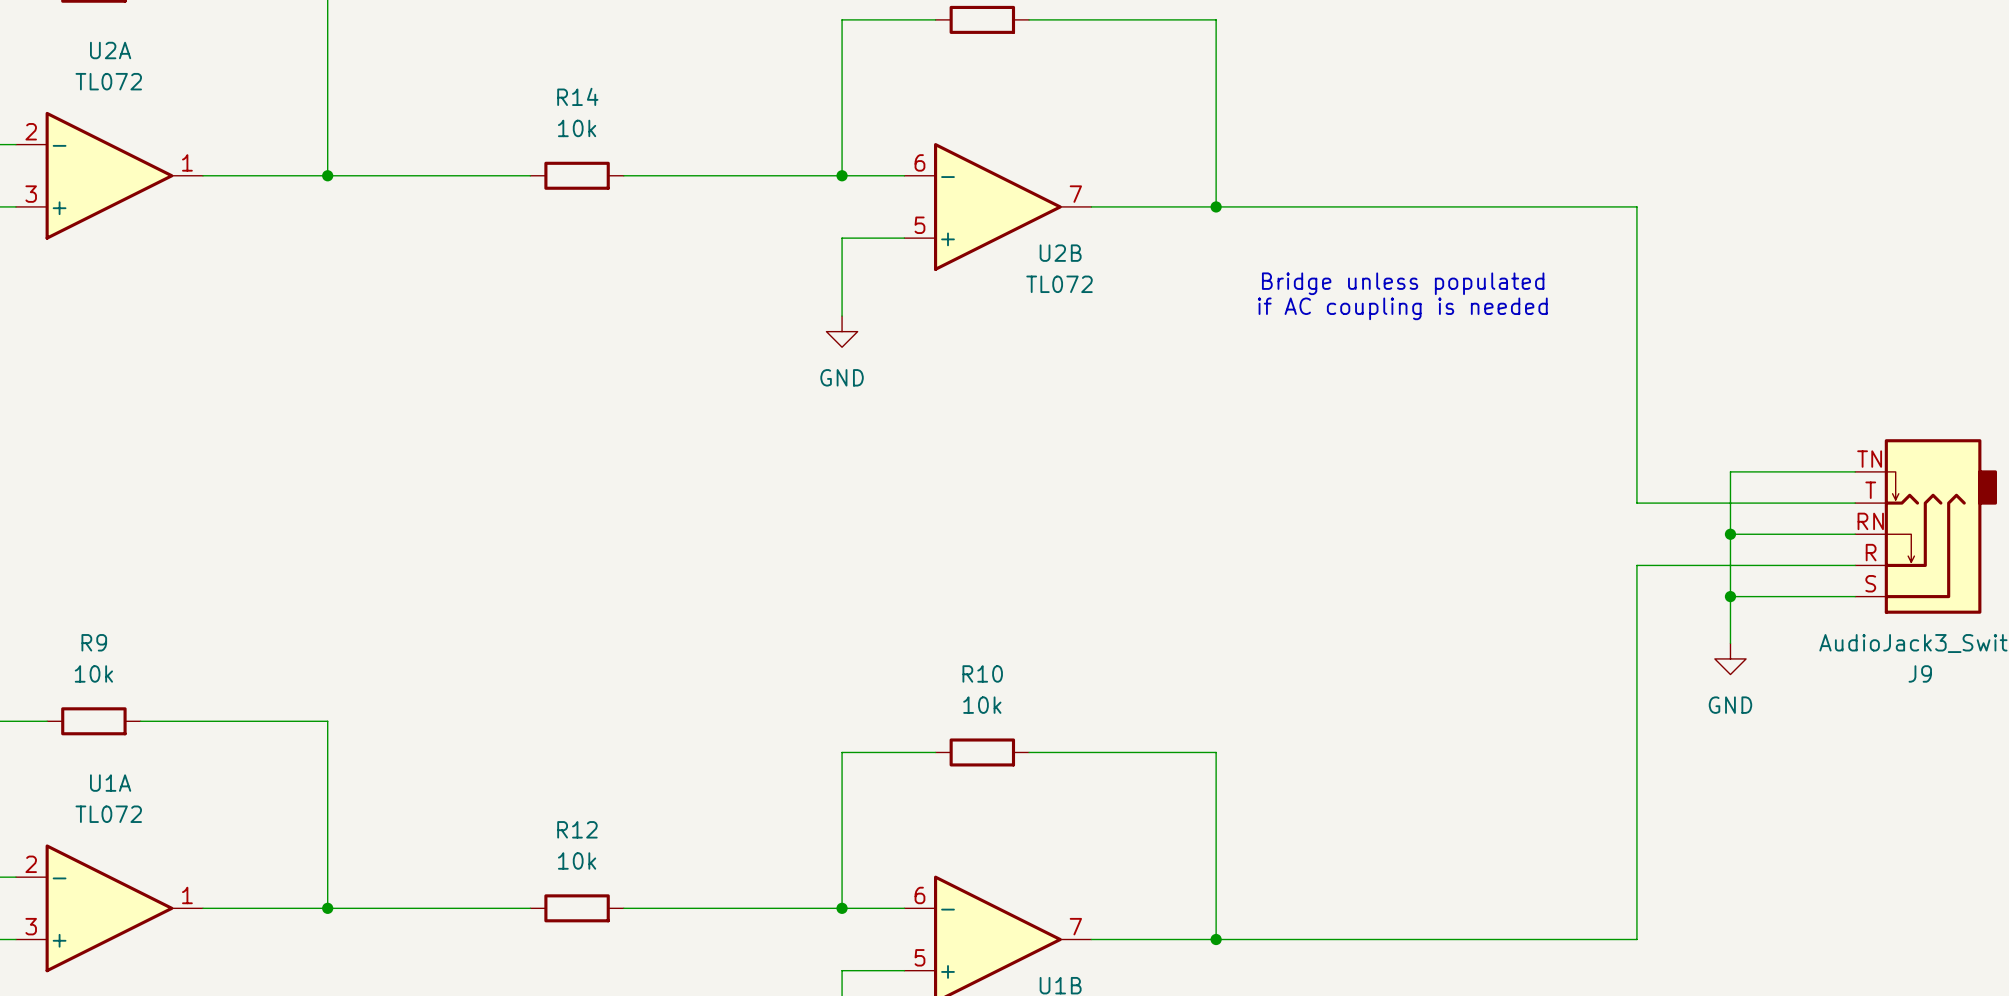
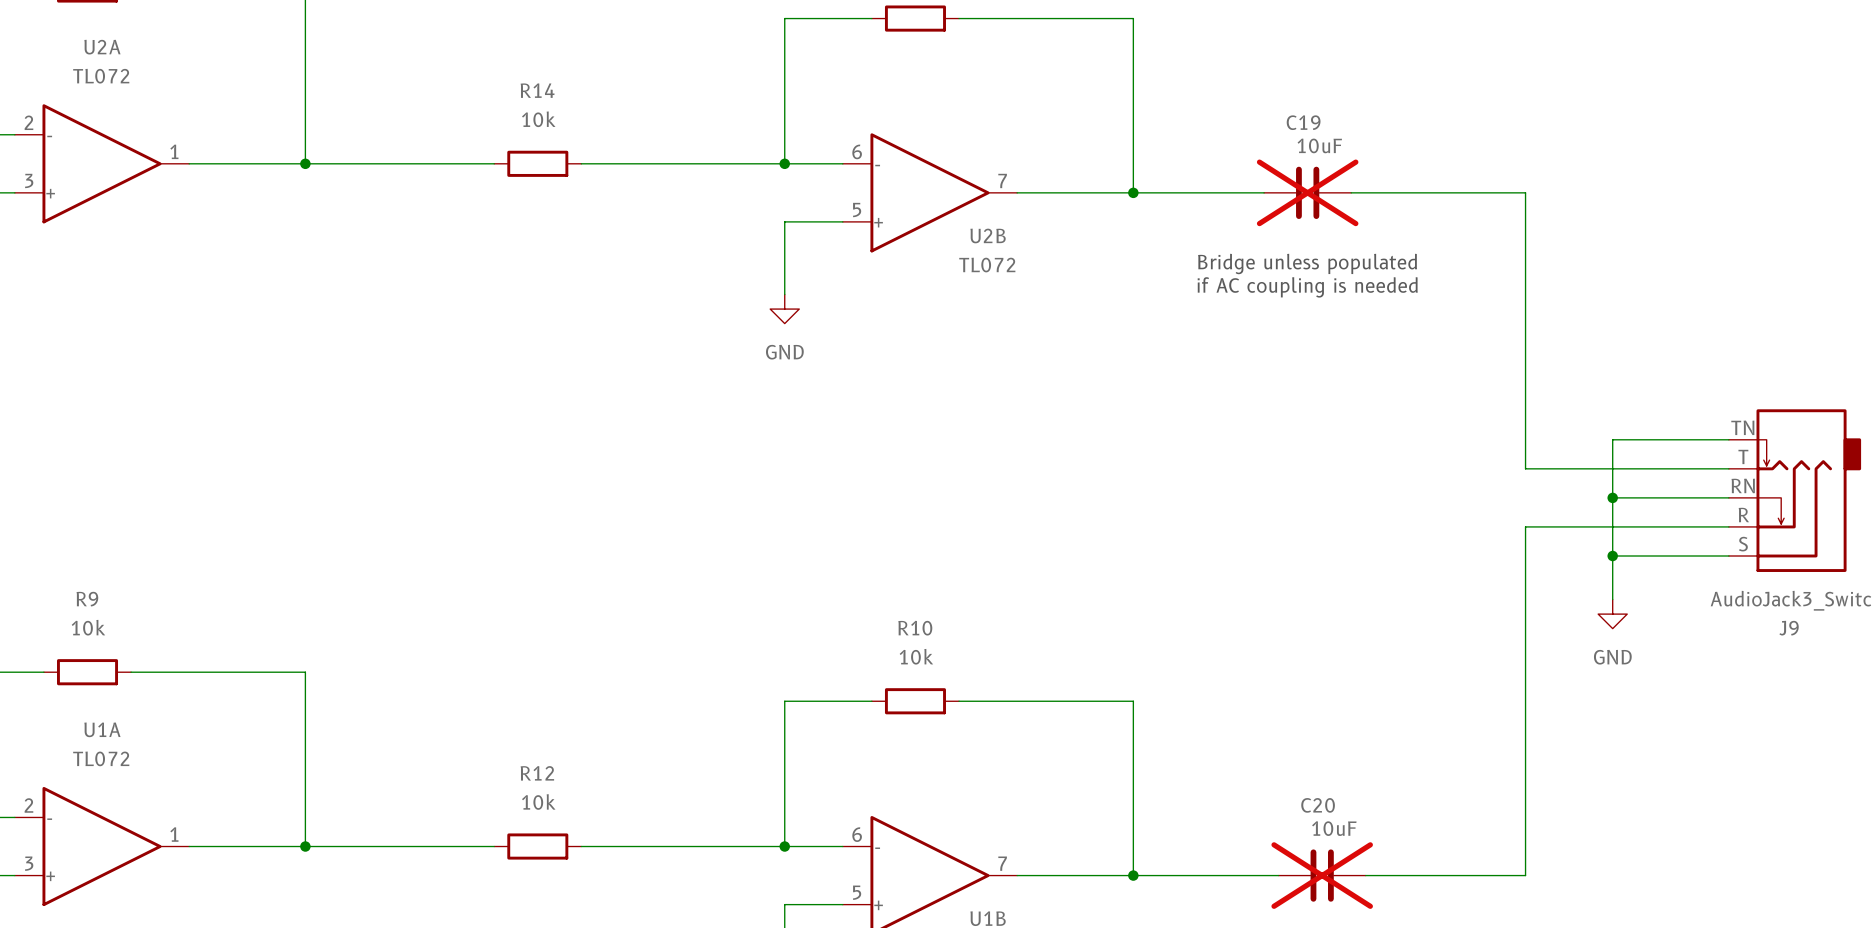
C19: none -> 10uF (1307, 192)
C20: none -> 10uF (1322, 875)

